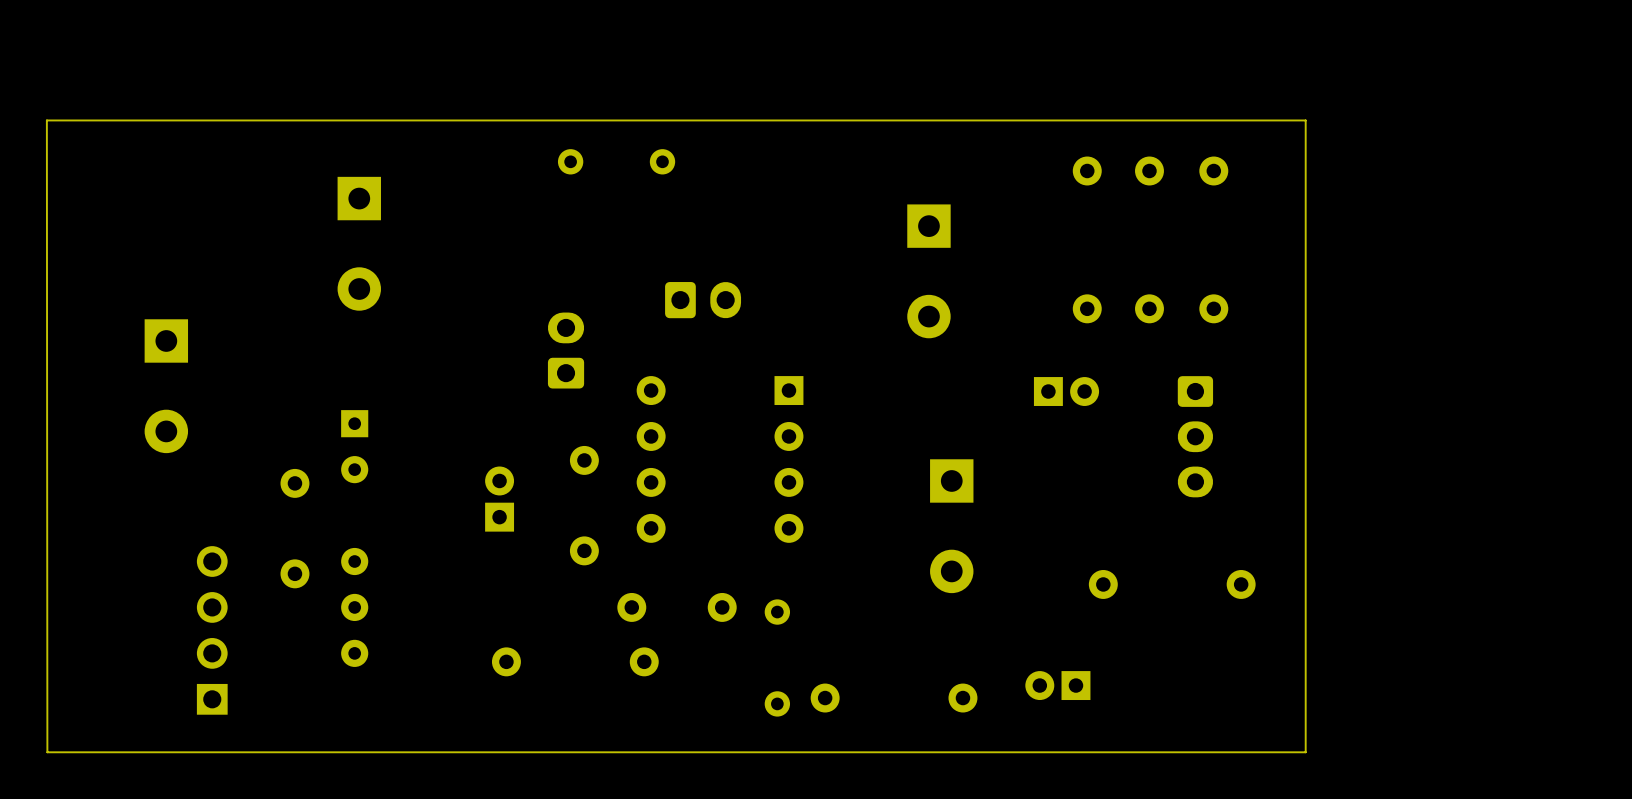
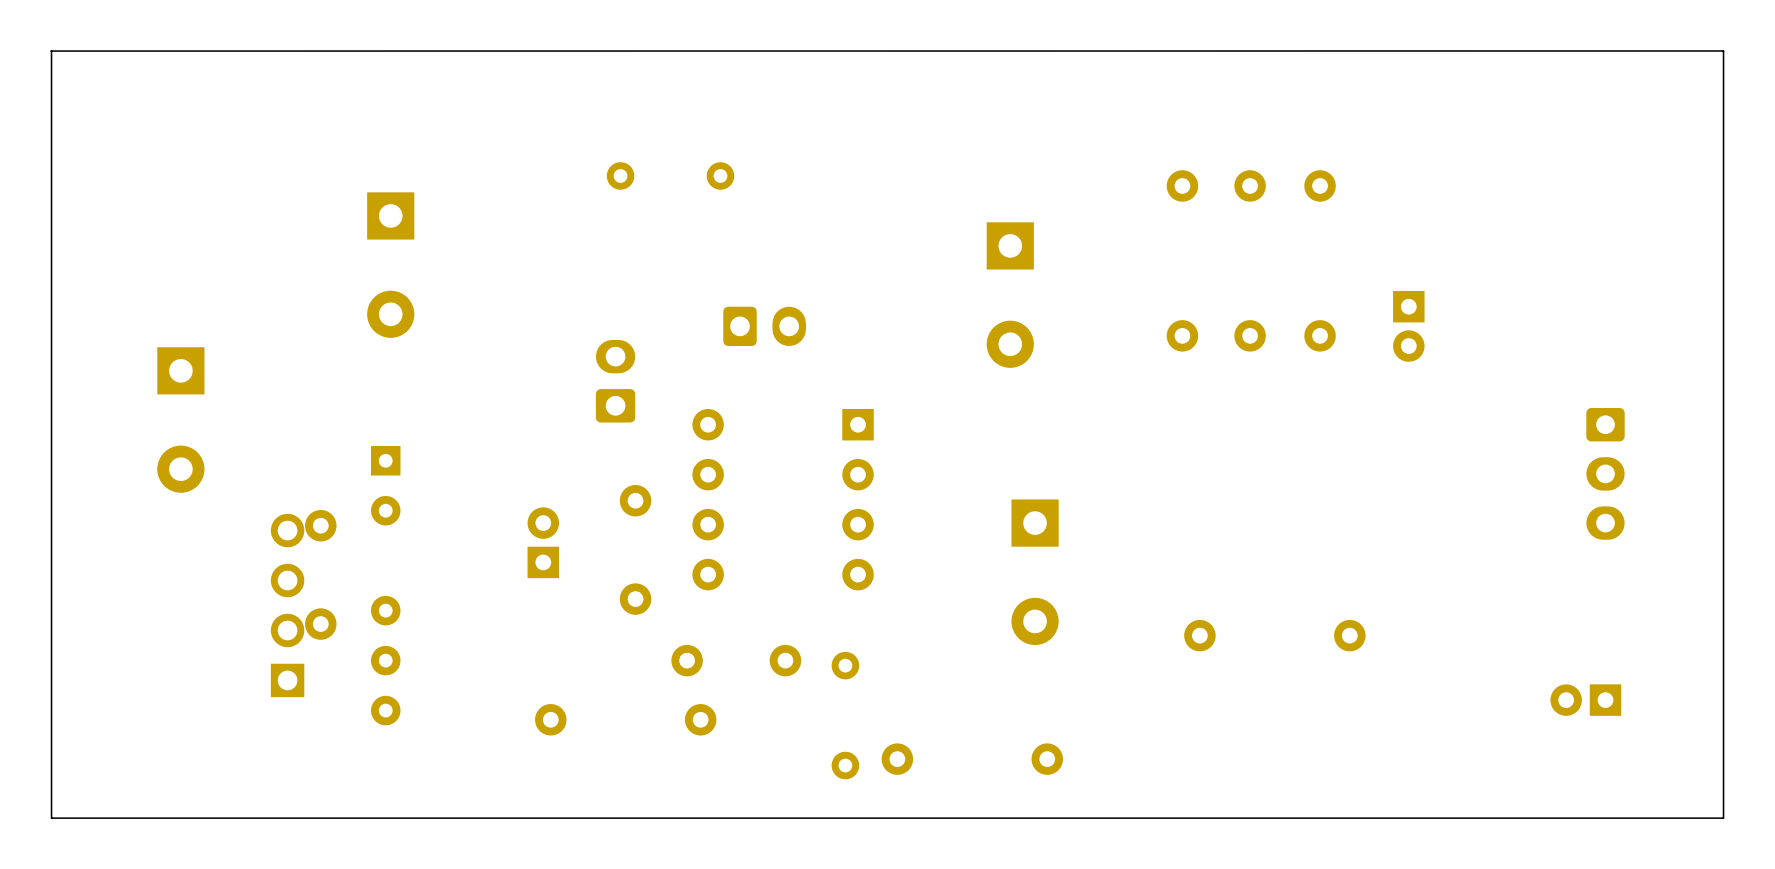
board edge: none -> (51, 50) (51, 818)
part: none -> (1408, 326)
part: (1066, 391) -> none
part position: (1195, 436) -> (1605, 473)
part position: (212, 630) -> (287, 605)
part: none -> (1585, 700)
part: (1057, 685) -> none
board edge: (1305, 752) (1305, 120) (46, 120) (47, 752) -> (1419, 818) (1723, 818) (1723, 50) (50, 51)

